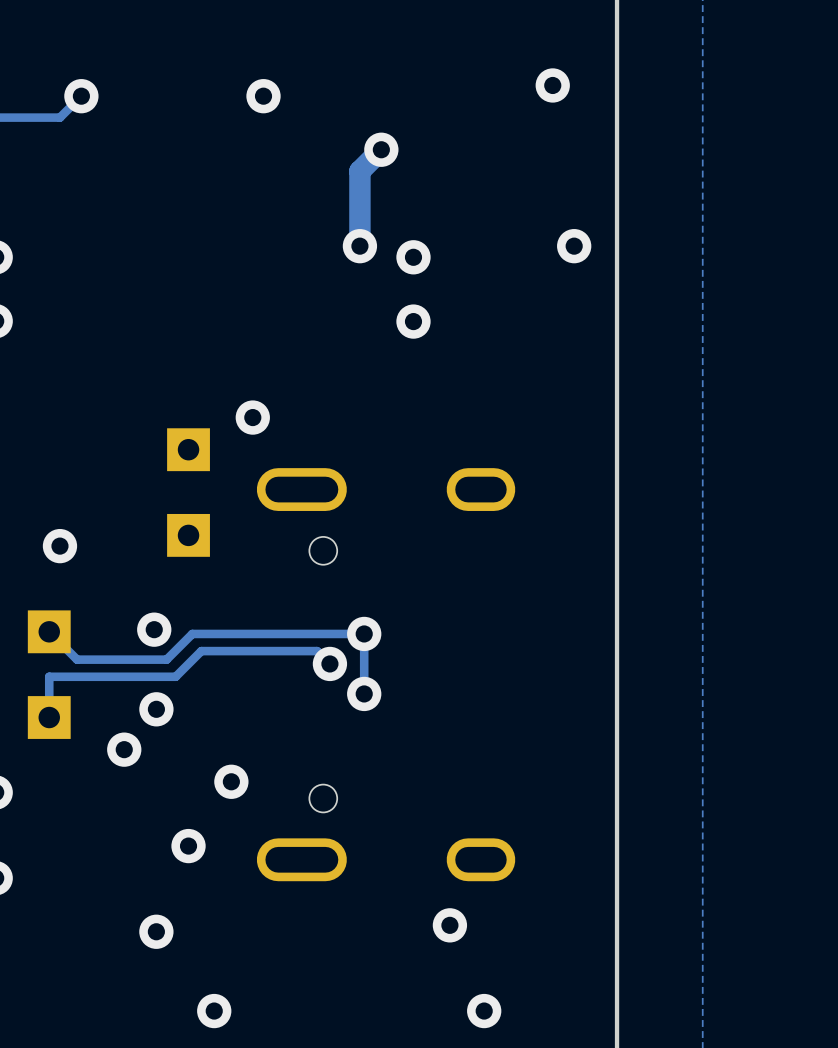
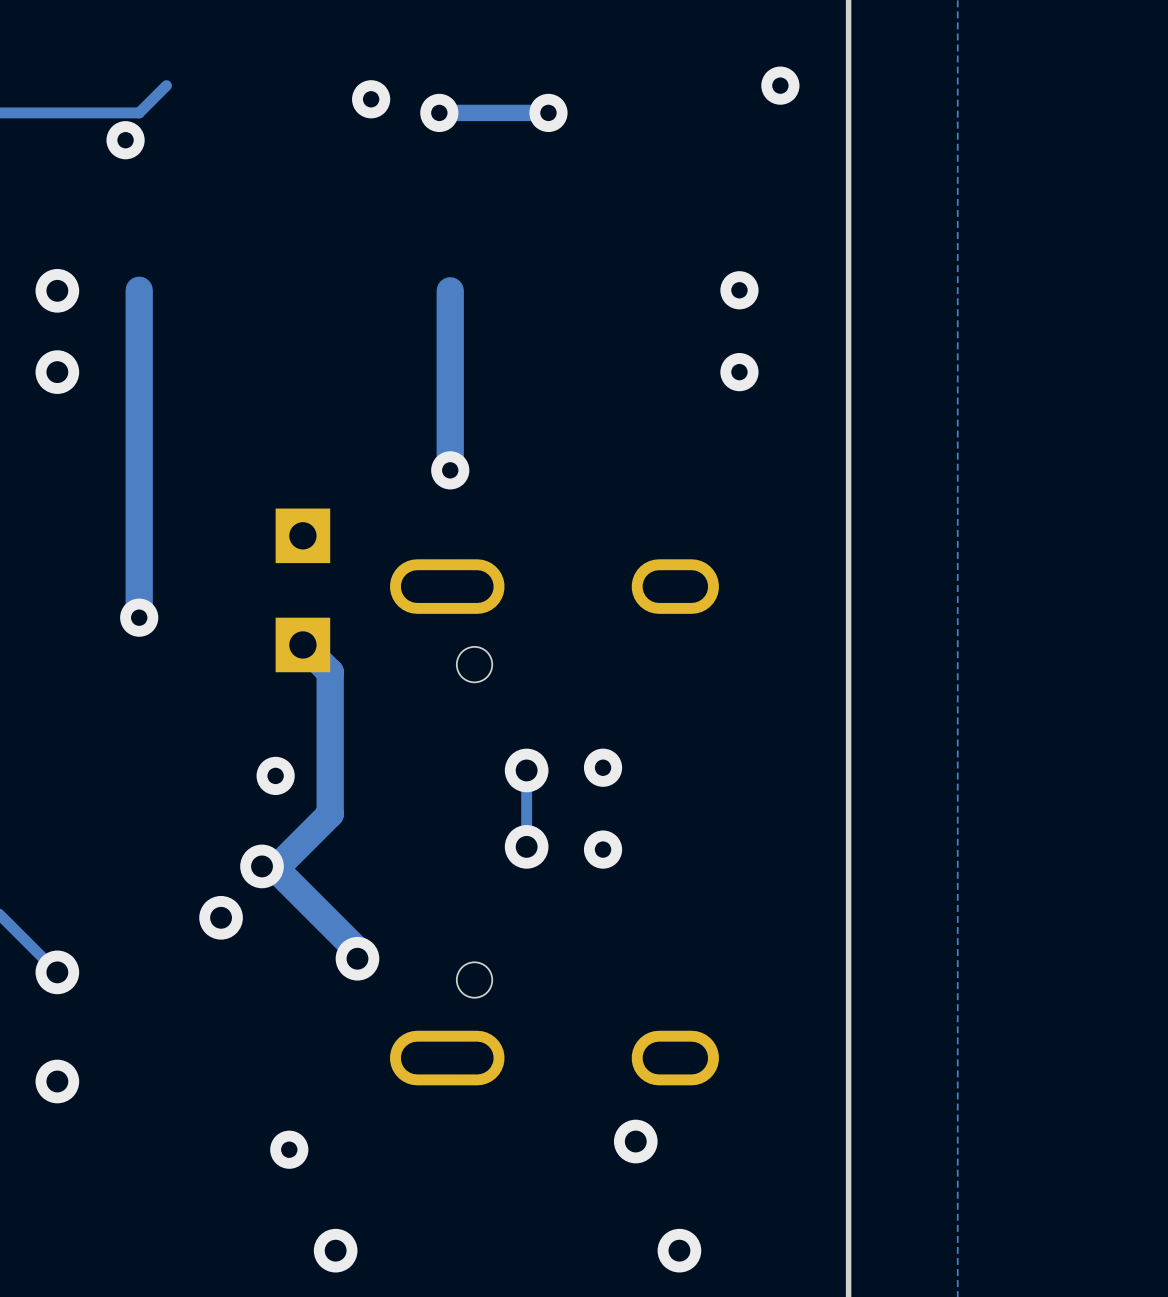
via position: (552, 85) -> (780, 85)
via: (81, 96) -> none
via: (263, 96) -> none
via: none -> (371, 99)
via: none -> (439, 112)
track: none -> (548, 112) (439, 112)
via: none -> (125, 140)
track: (381, 149) (359, 171) (359, 246) -> none
via position: (381, 149) -> (548, 112)
via: (359, 246) -> none
via: (574, 246) -> none
track: none -> (139, 290) (139, 617)
via: none -> (739, 290)
track: none -> (450, 290) (450, 470)
via: (413, 257) -> none
via: (413, 321) -> none
via: none -> (739, 372)
via: none -> (450, 470)
via: (252, 417) -> none
track: none -> (302, 644) (330, 672) (330, 814) (275, 868) (357, 950) (357, 958)
via position: (59, 546) -> (139, 617)
via position: (154, 629) -> (275, 775)
track: (49, 631) (77, 659) (166, 659) (192, 633) (364, 633) -> none
part: (49, 631) -> none
via: none -> (603, 767)
track: (329, 663) (317, 651) (201, 651) (175, 676) (49, 676) (49, 717) -> none
via: (329, 663) -> none
via: none -> (603, 849)
part: (49, 717) -> none
via: (188, 846) -> none
via position: (156, 931) -> (289, 1149)

